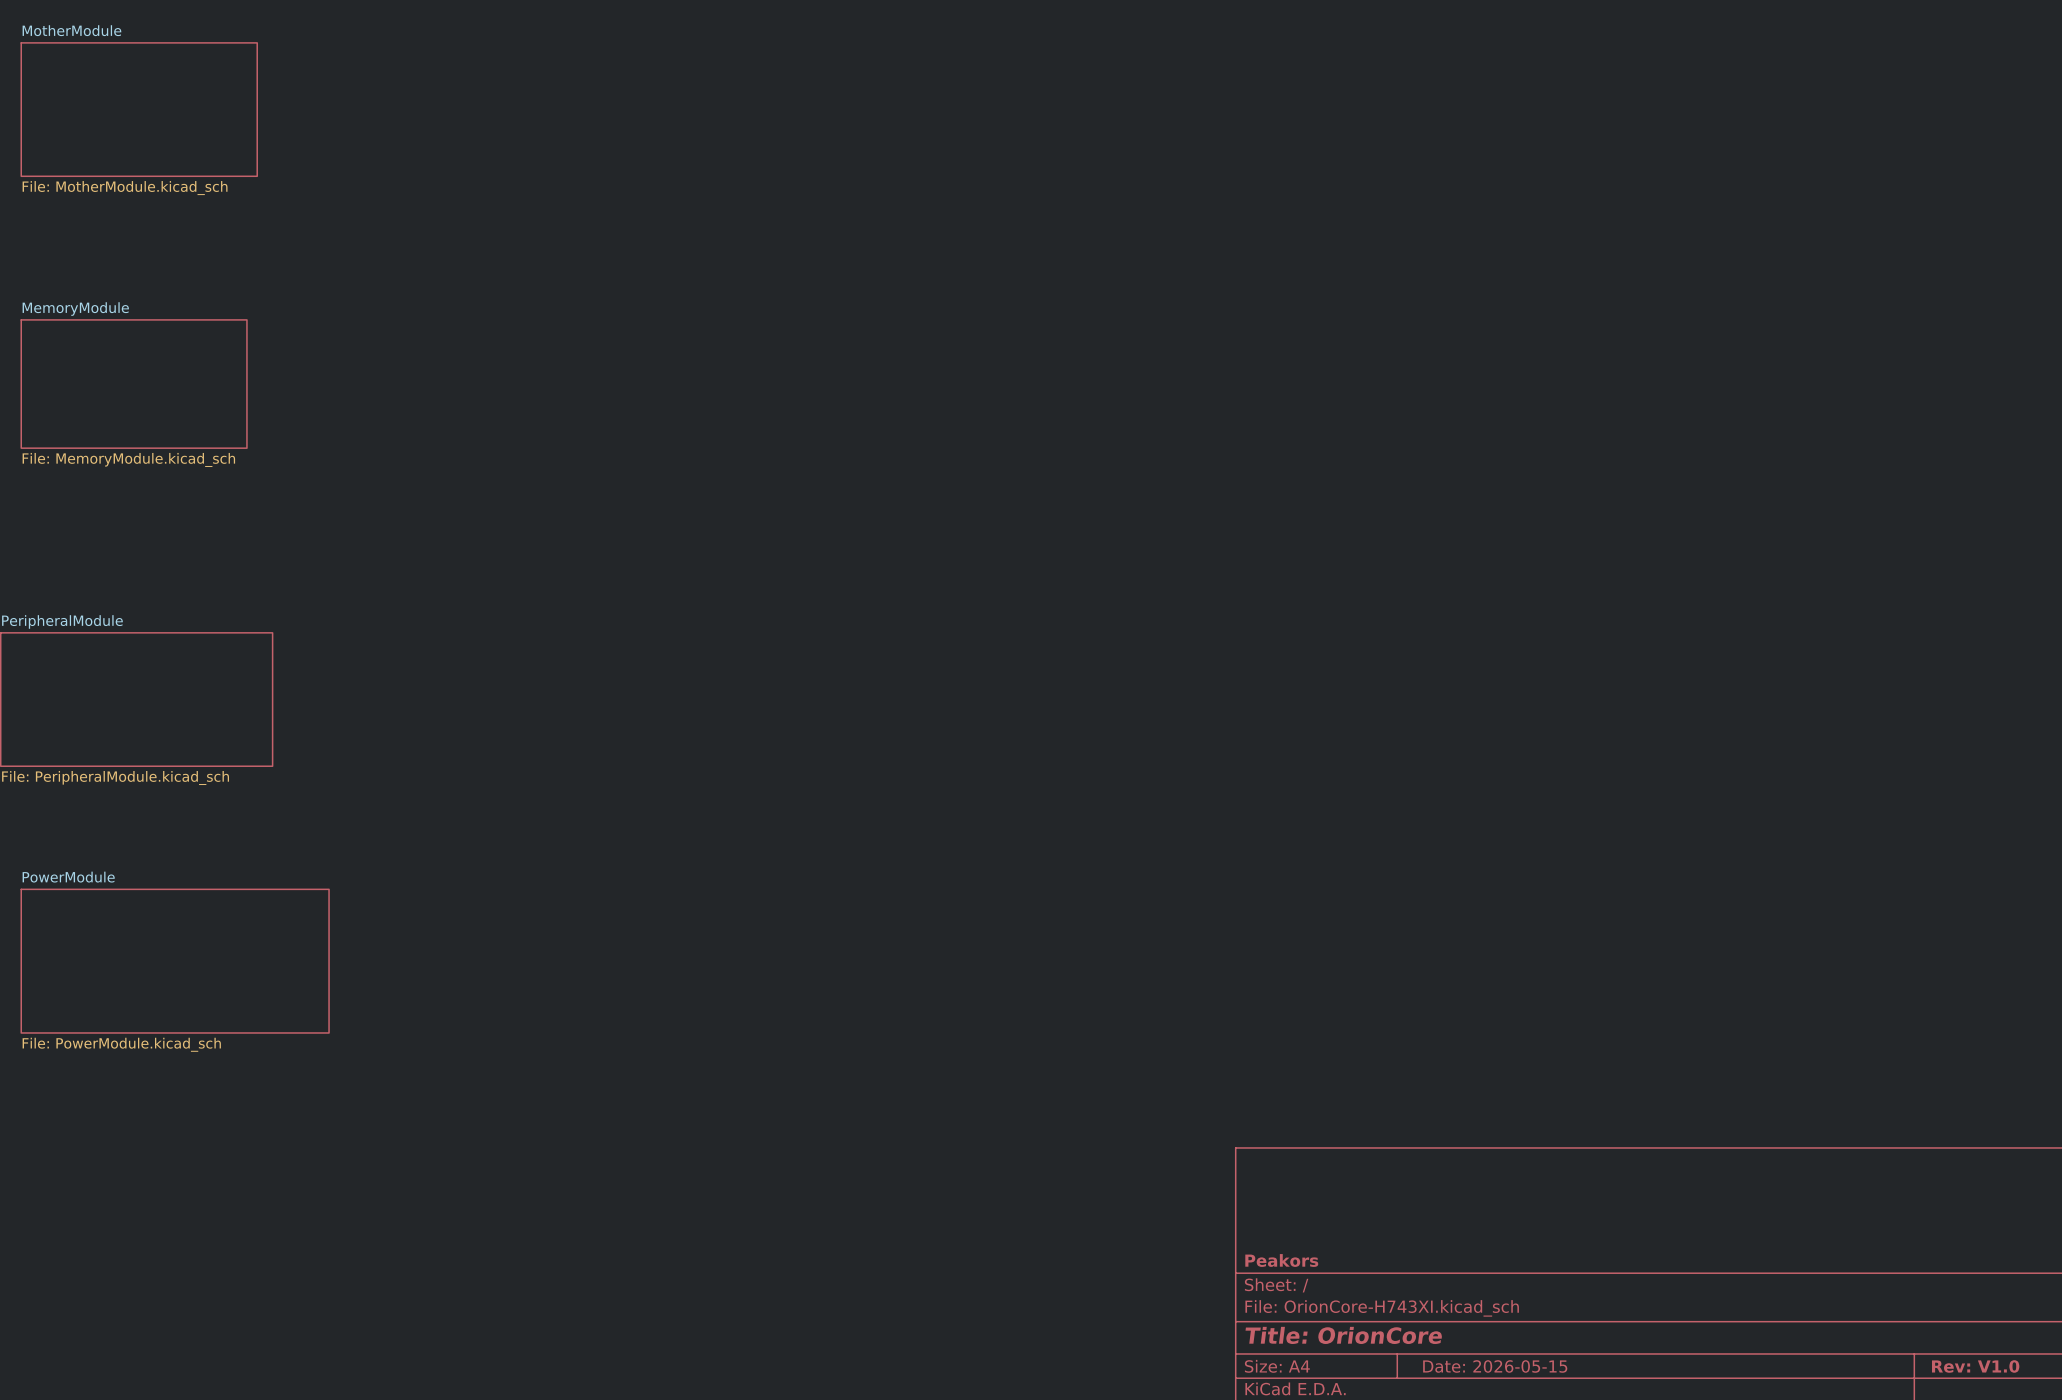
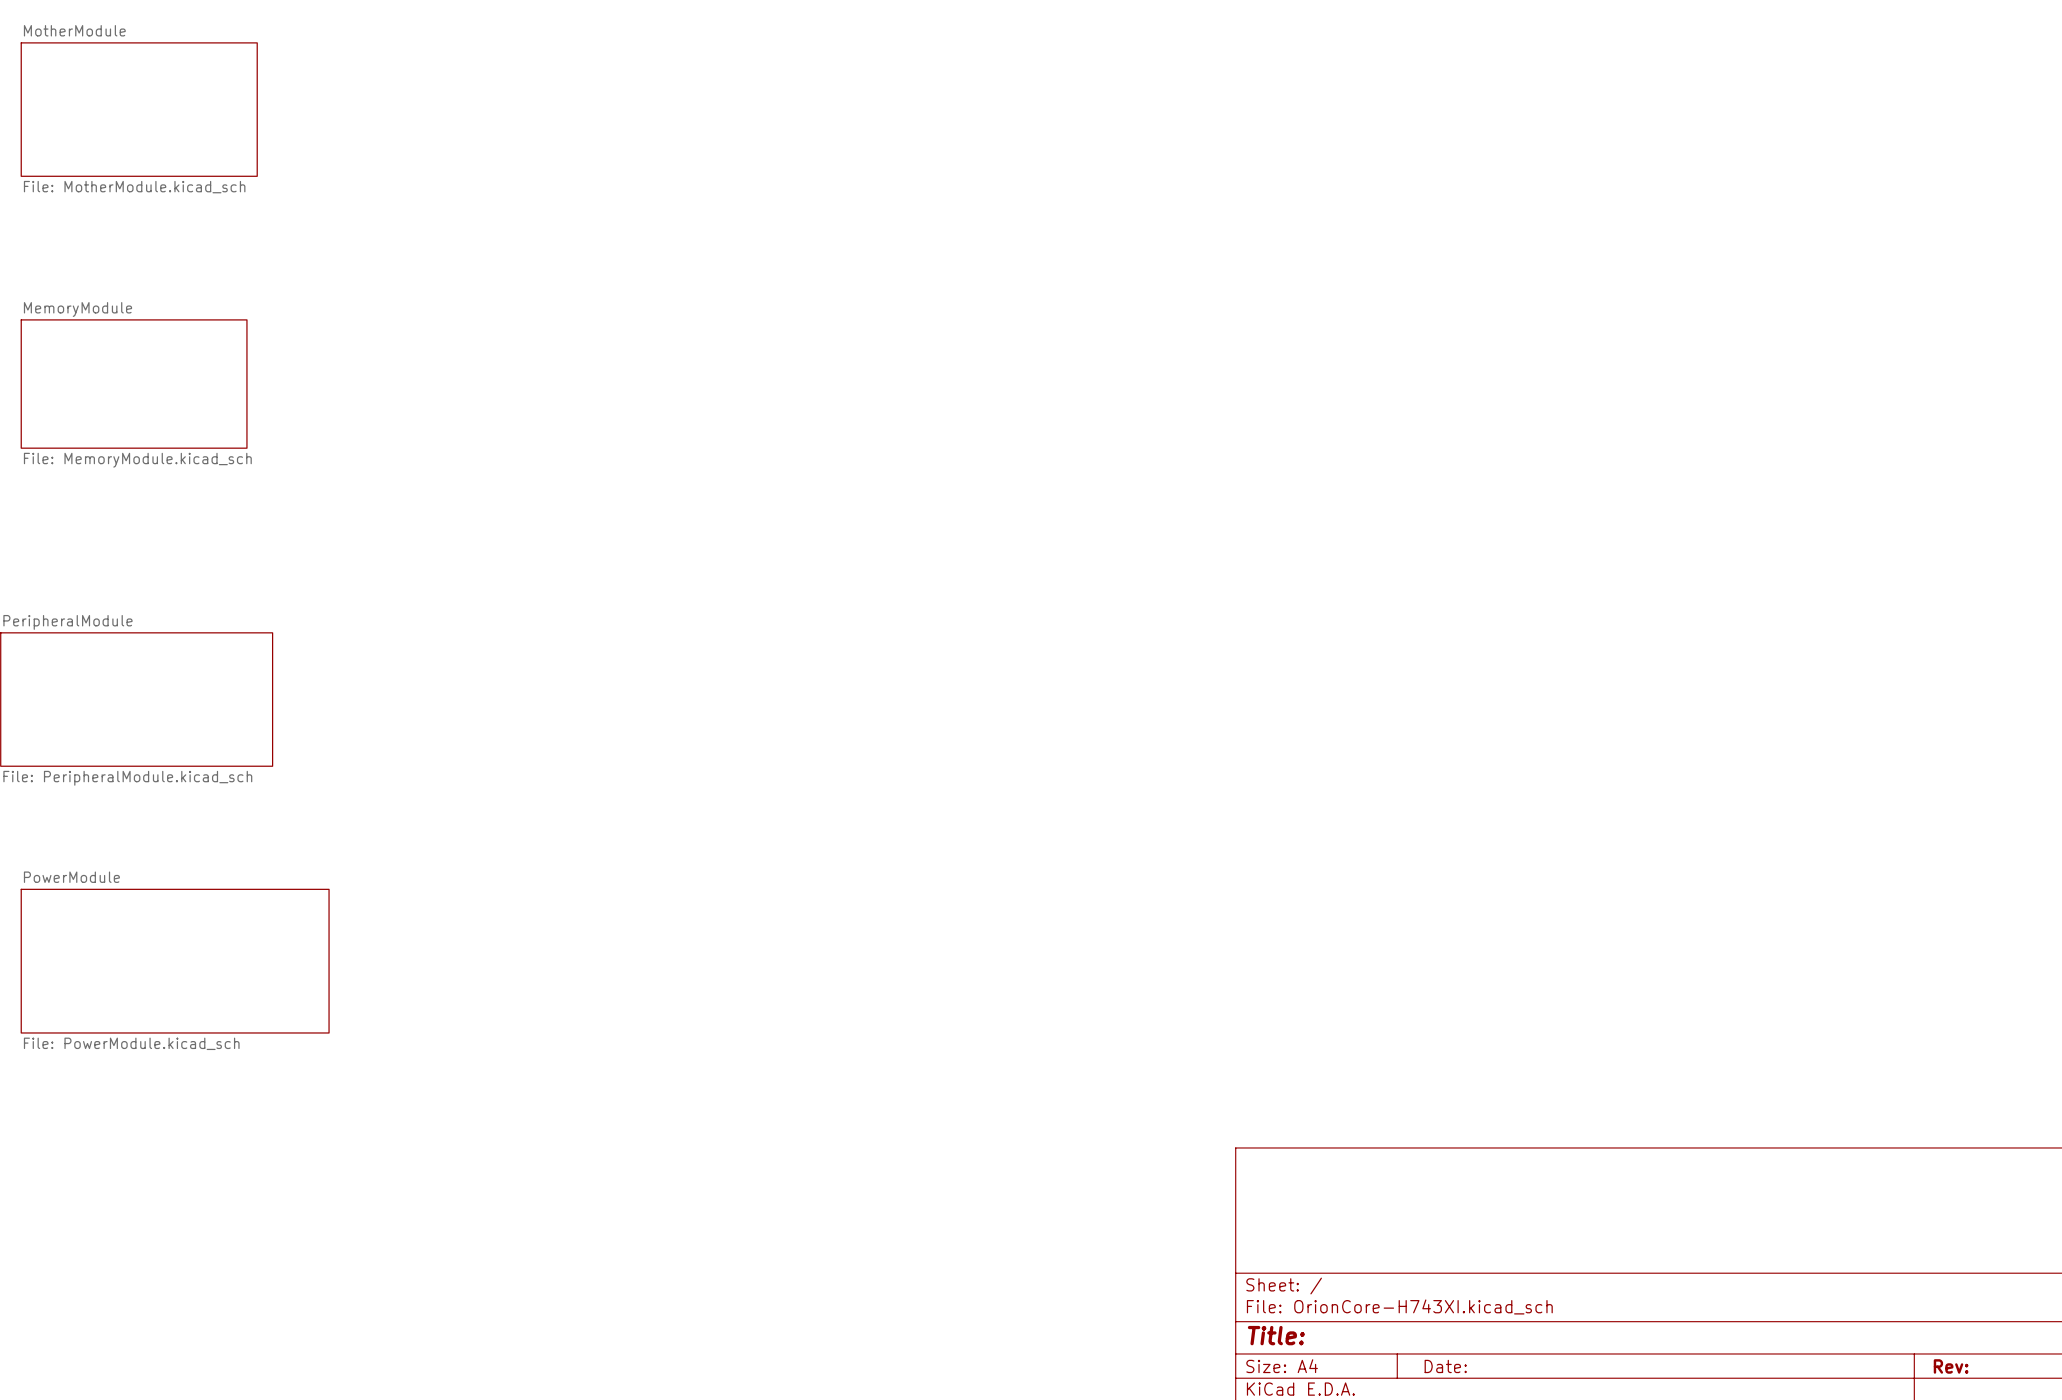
title block: Peakors (1281, 1260) -> none
title block: Title: OrionCore (1343, 1335) -> Title: (1276, 1335)
title block: Date: 2026-05-15 (1495, 1366) -> Date: (1445, 1366)
title block: Rev: V1.0 (1975, 1366) -> Rev: (1951, 1366)

